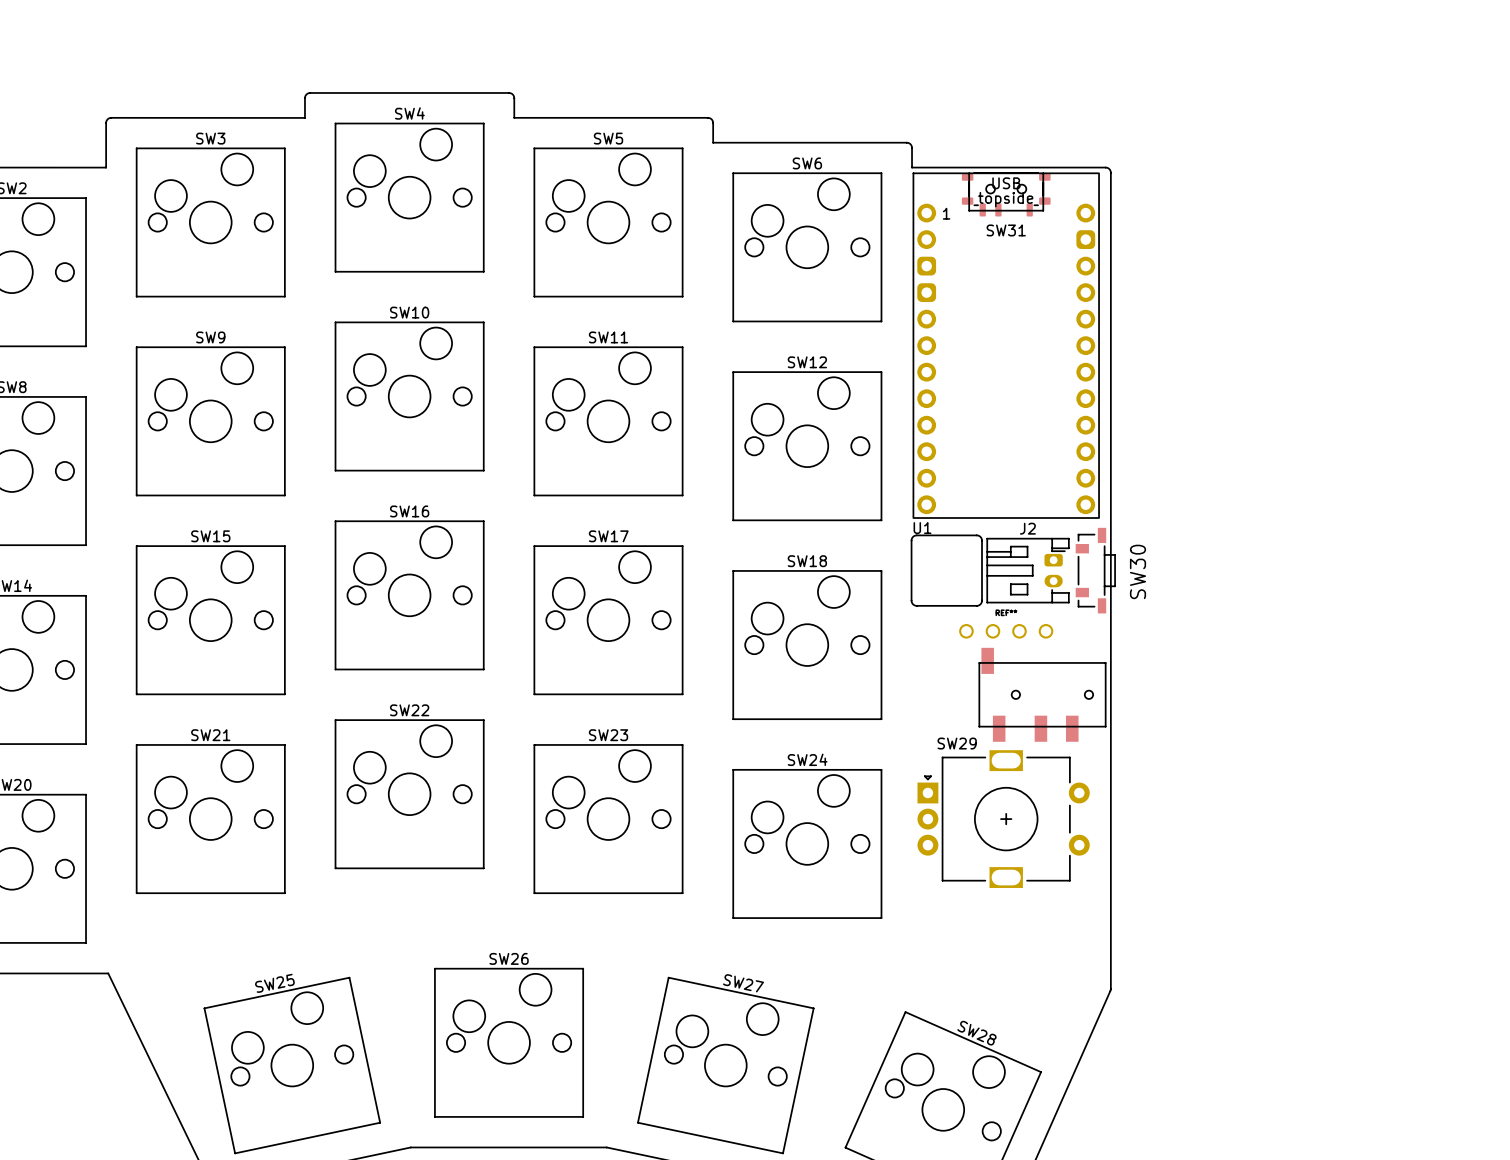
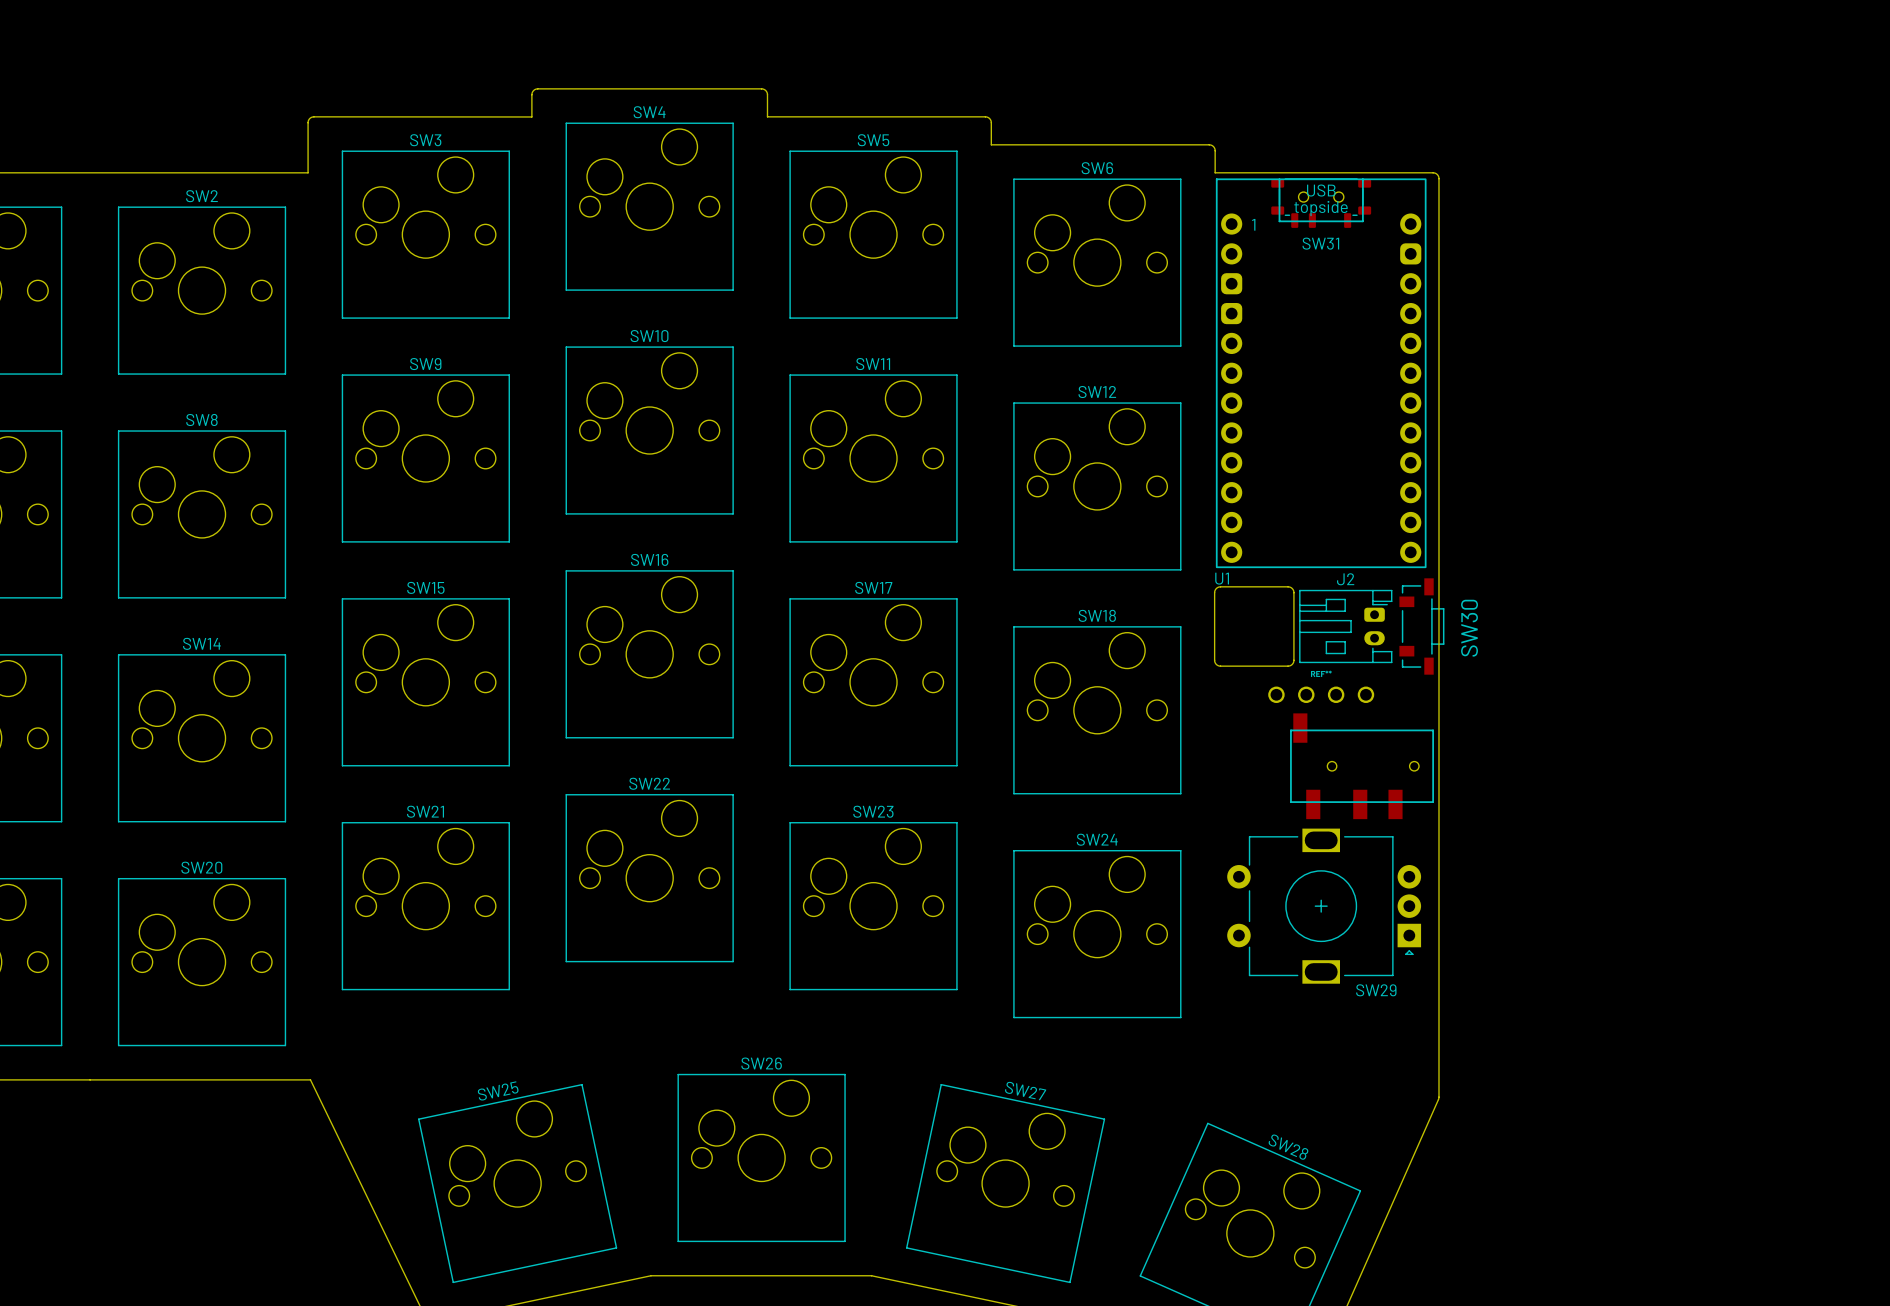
SW29 rotation: 0° (1003, 819) -> 180° (1324, 906)

